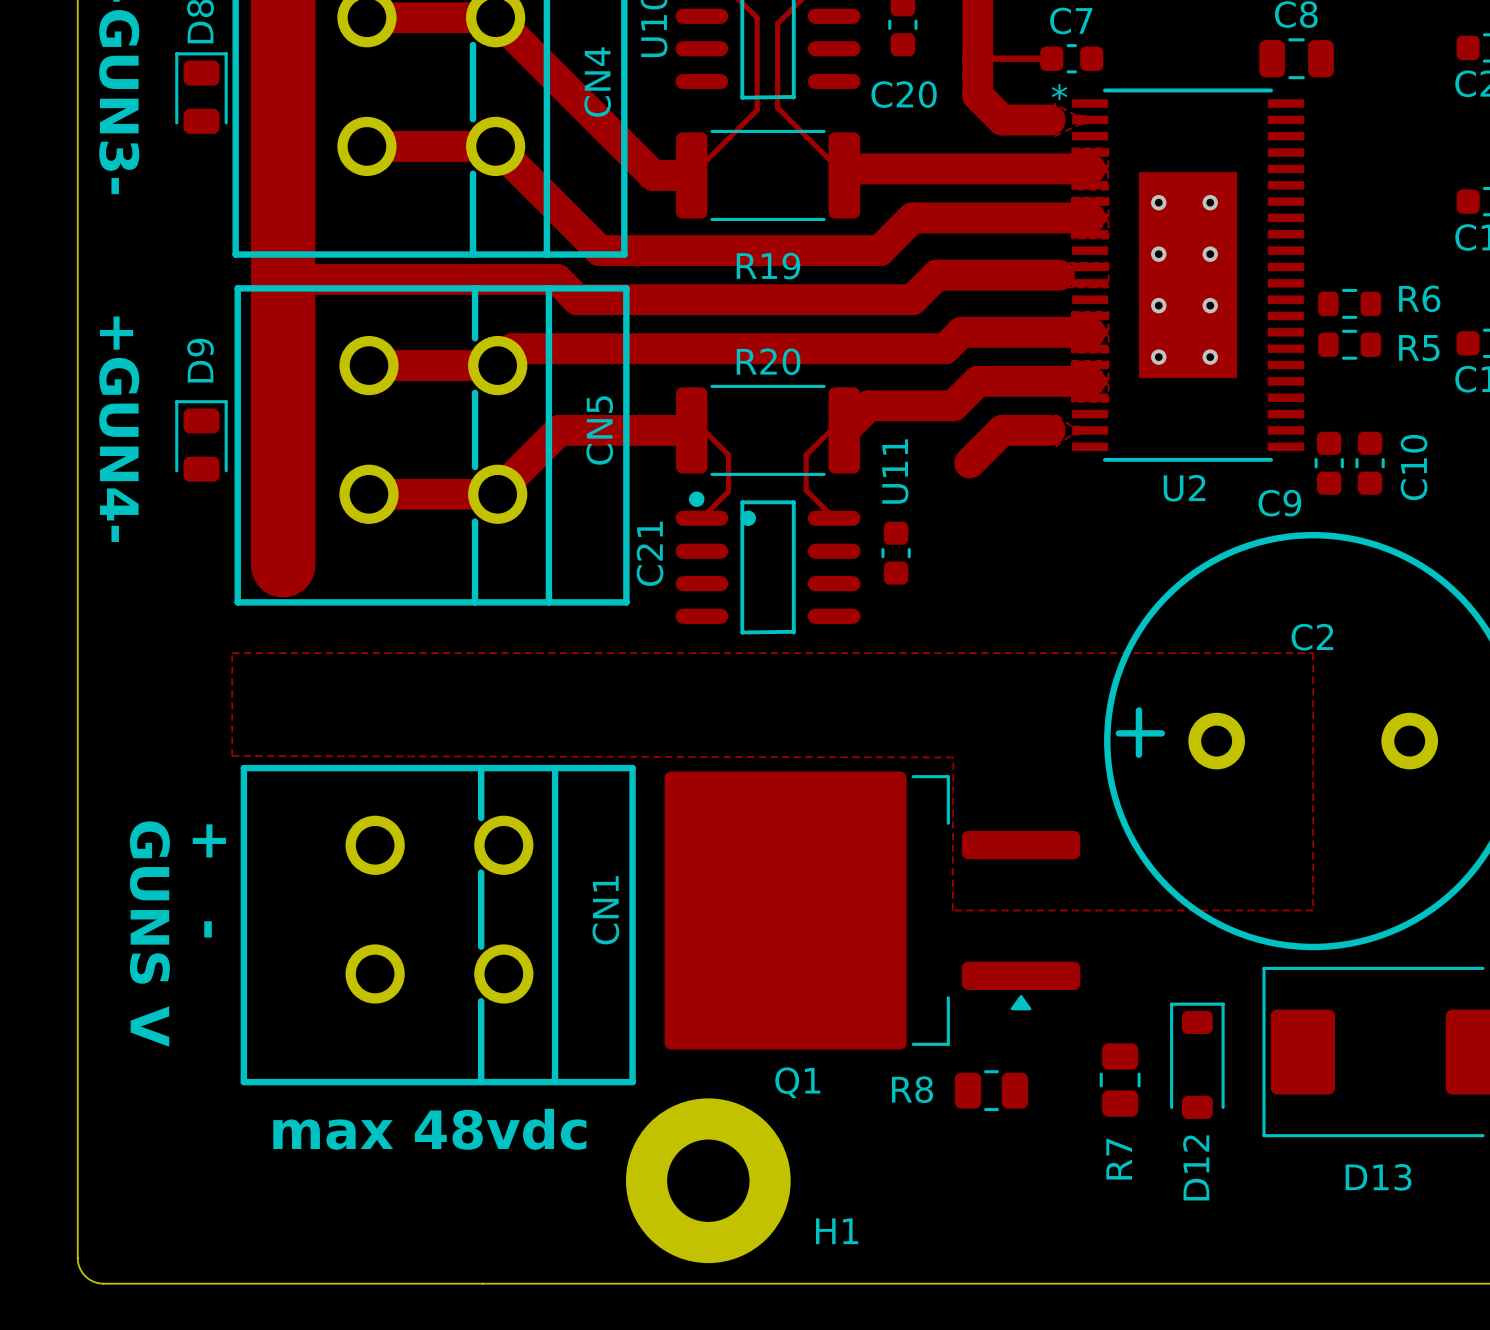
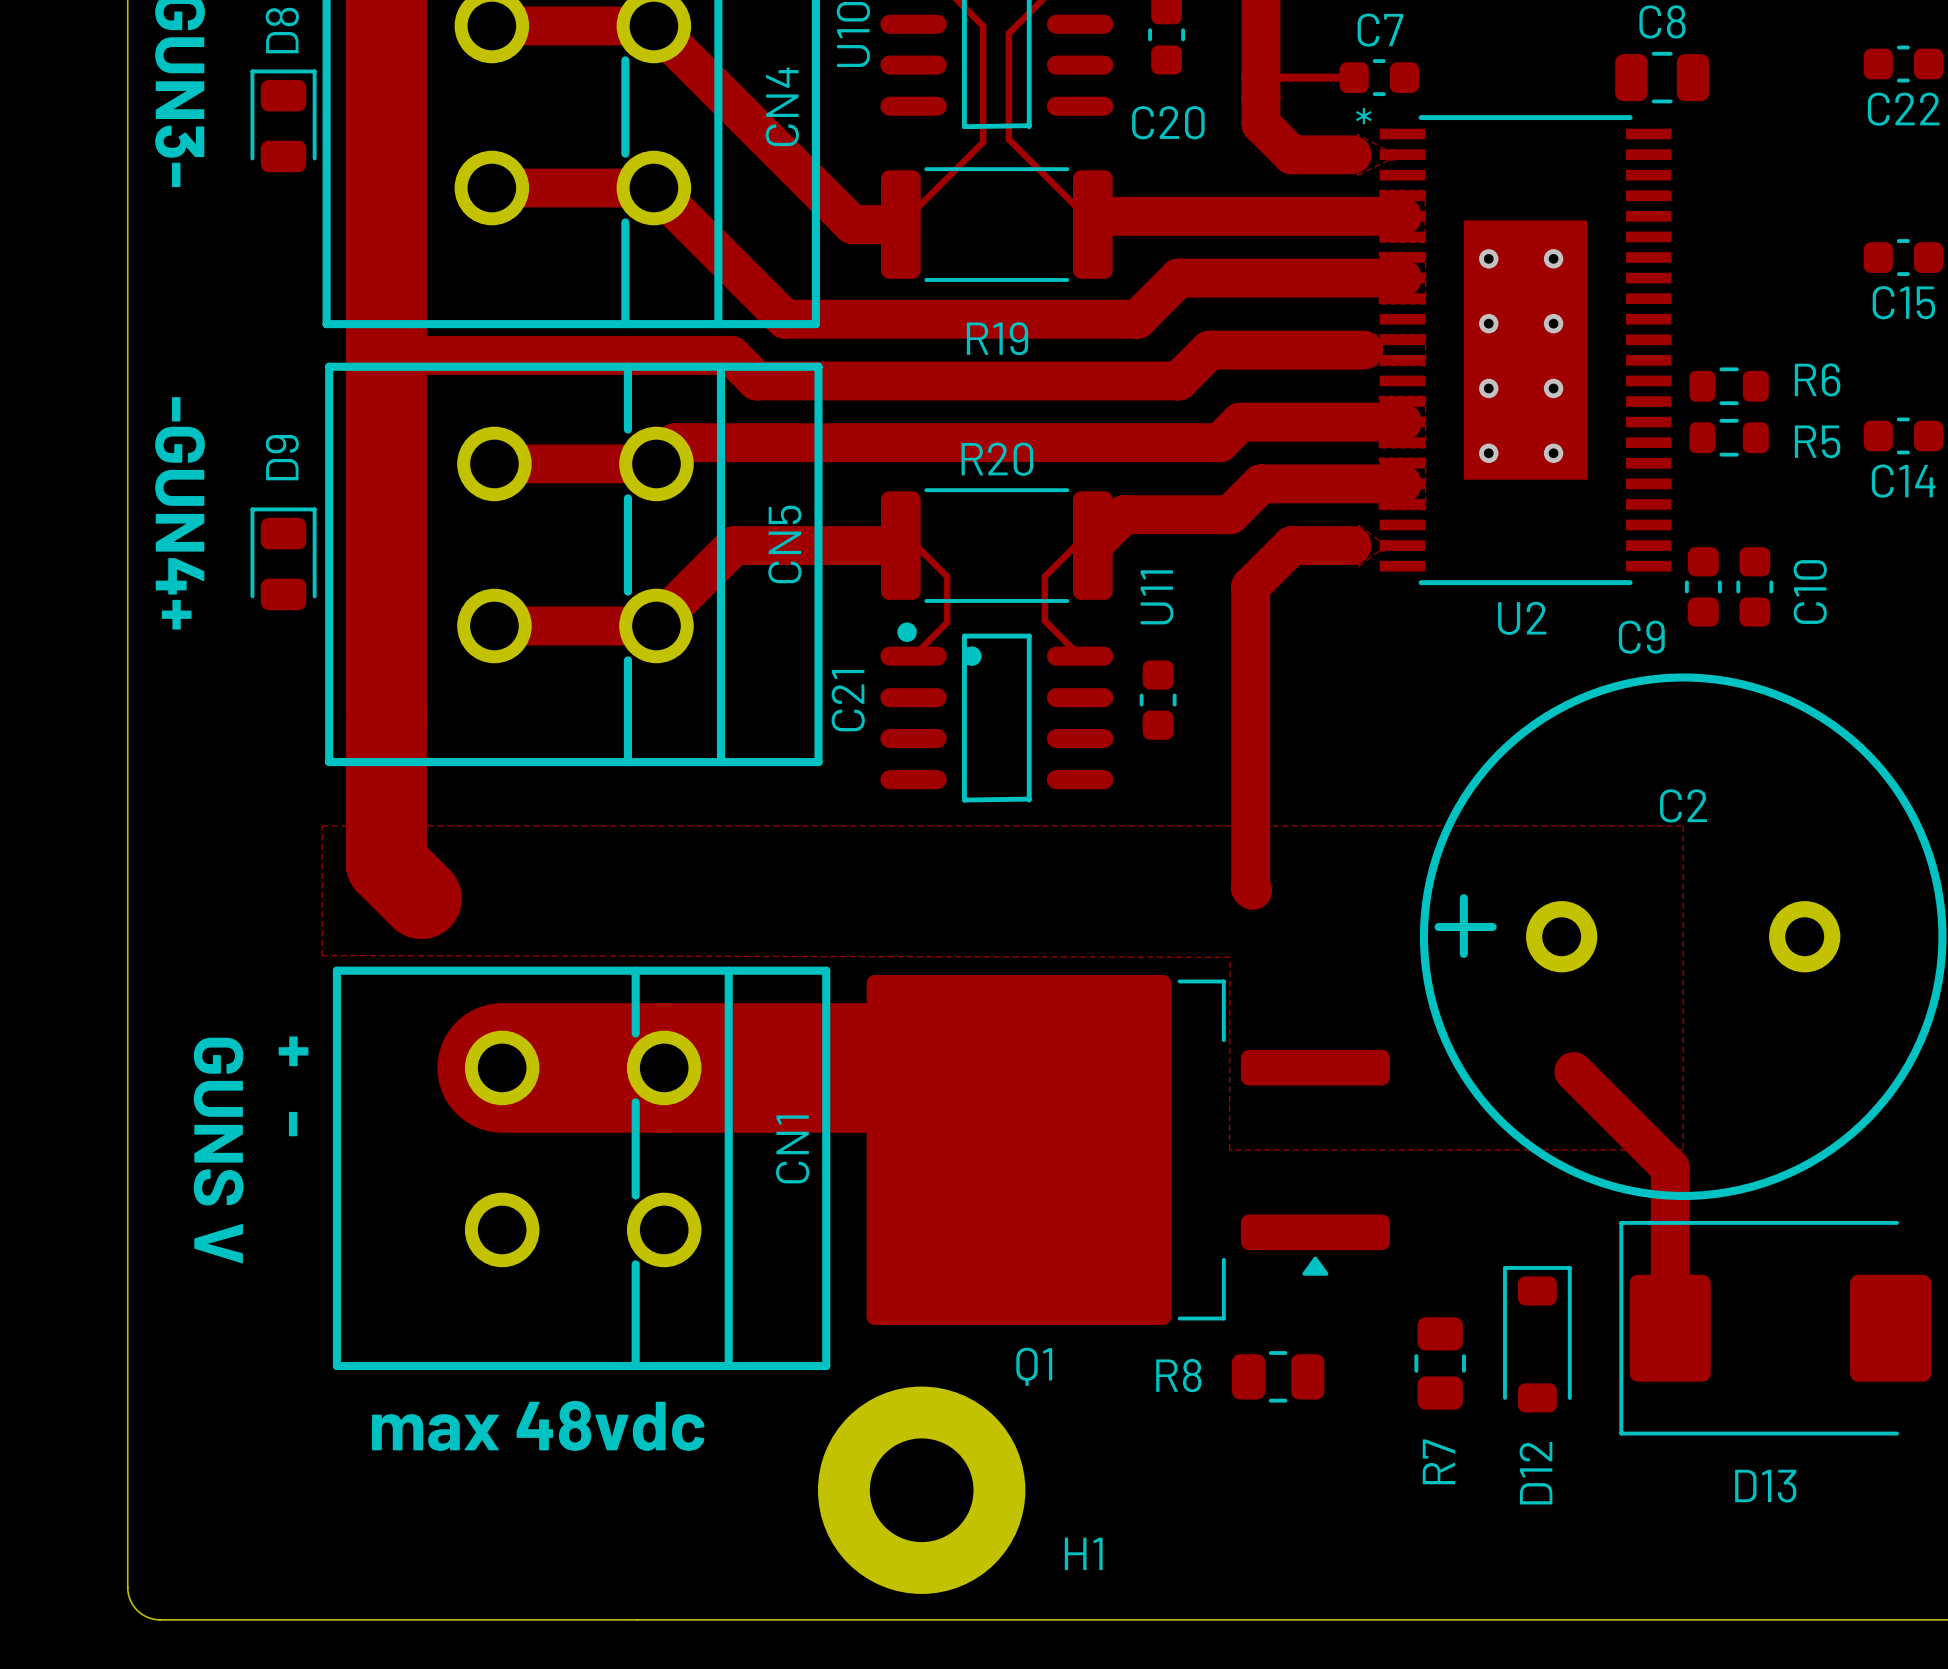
text: +GUN4- (119, 429) -> -GUN4+ (180, 513)
track: none -> (1250, 586) (1250, 888) (1252, 890)
track: none -> (386, 715) (386, 863) (421, 898)
track: none -> (502, 1067) (936, 1067) (1018, 1149)
track: none -> (1573, 1071) (1670, 1168) (1670, 1328)

